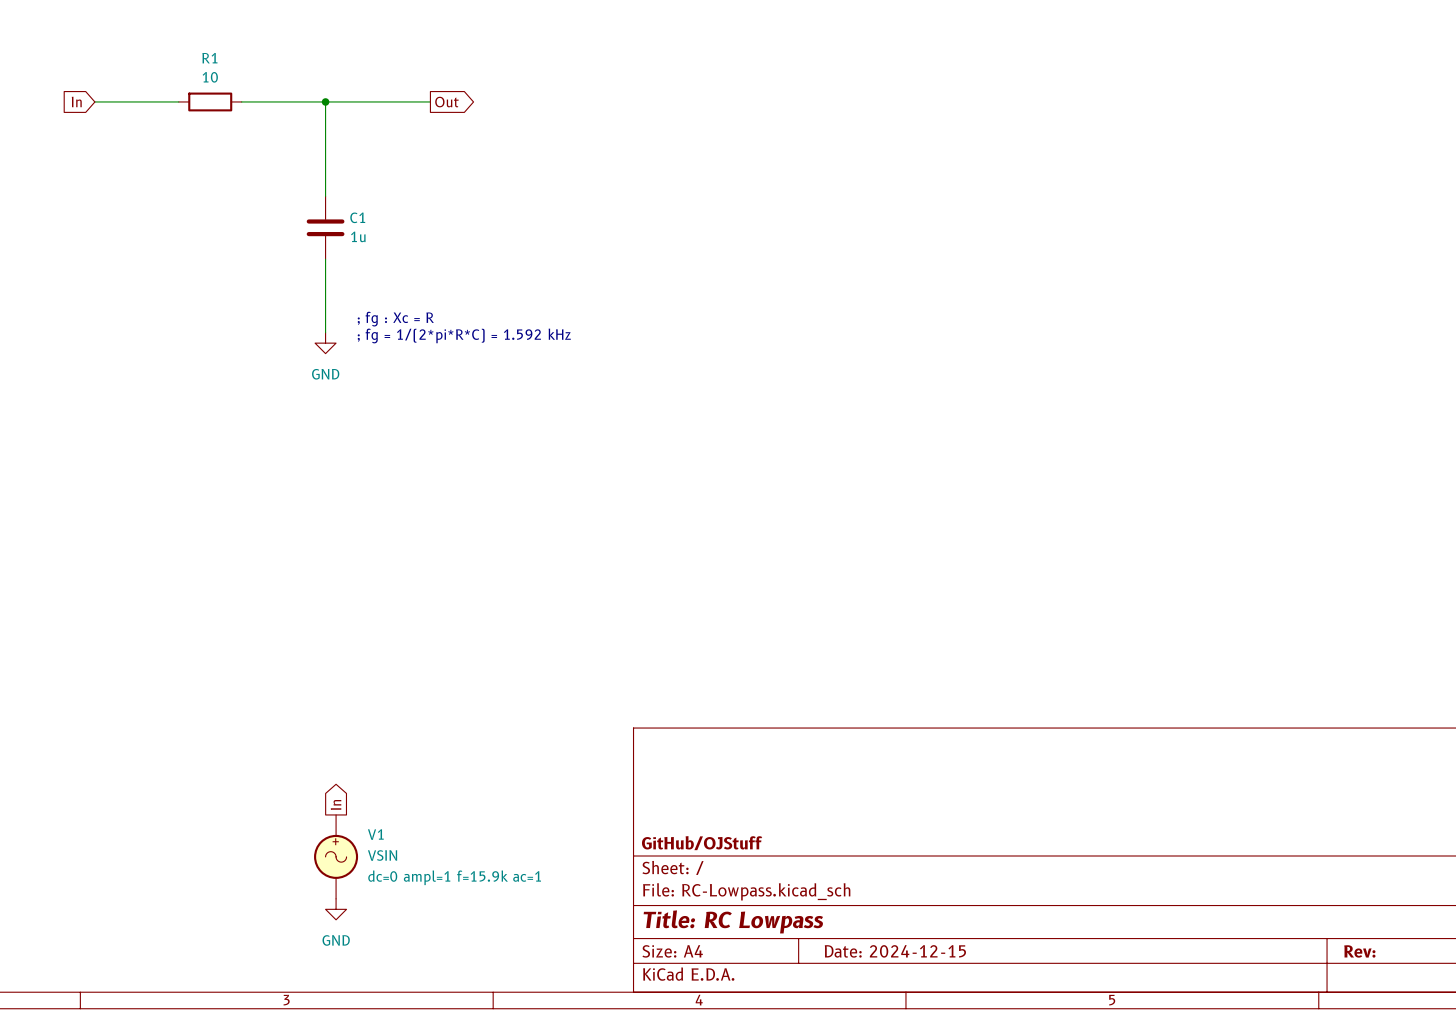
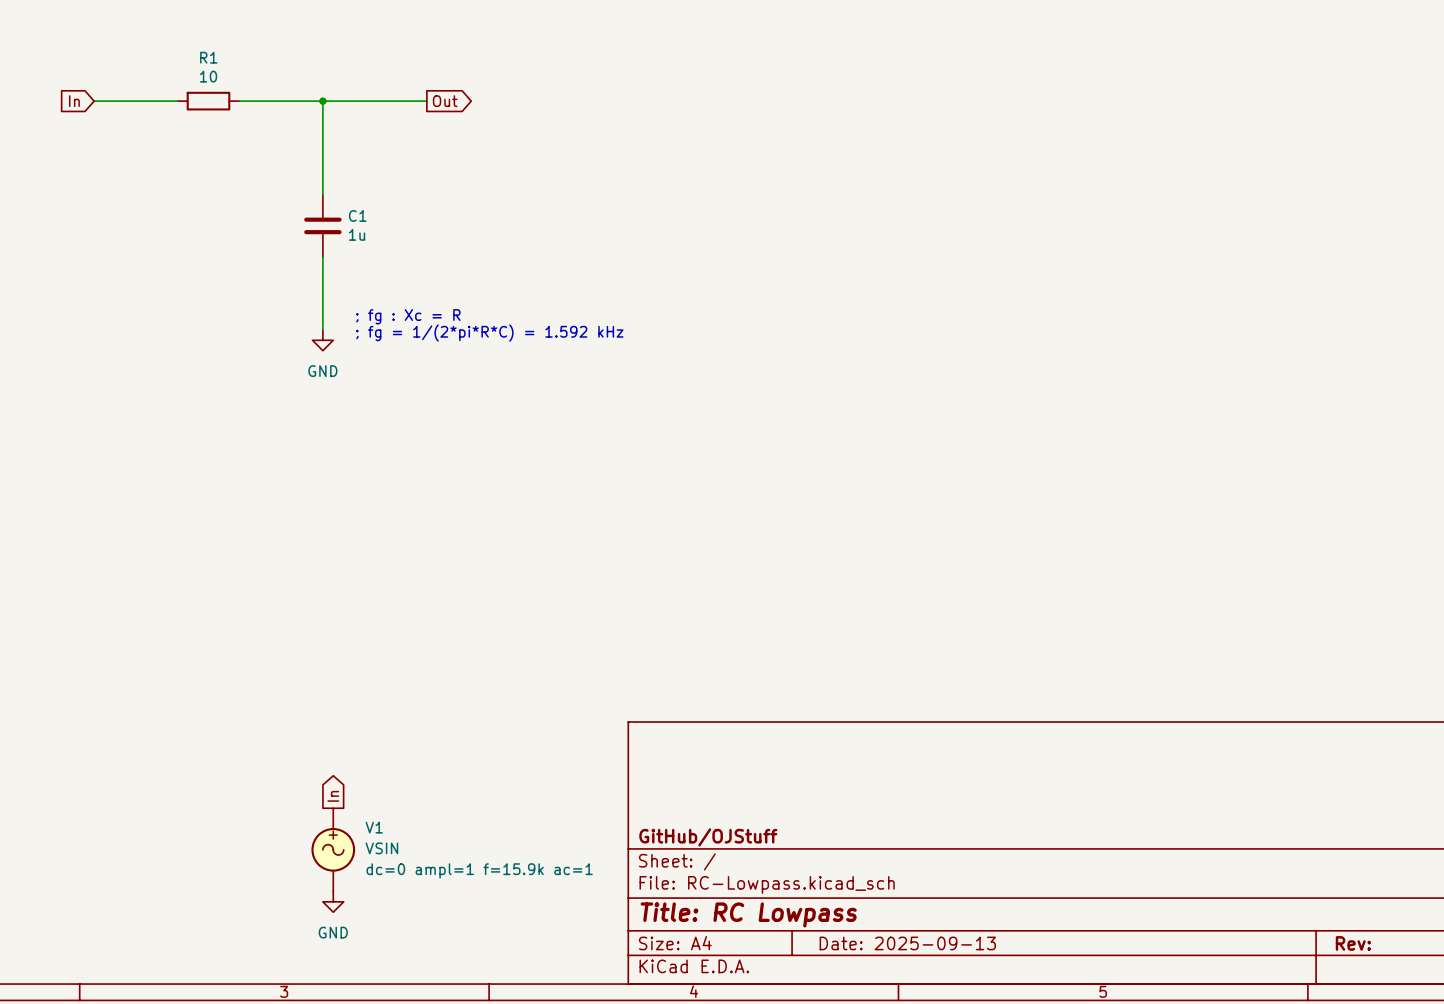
title block: Date: 2024-12-15 (895, 951) -> Date: 2025-09-13 (907, 943)

